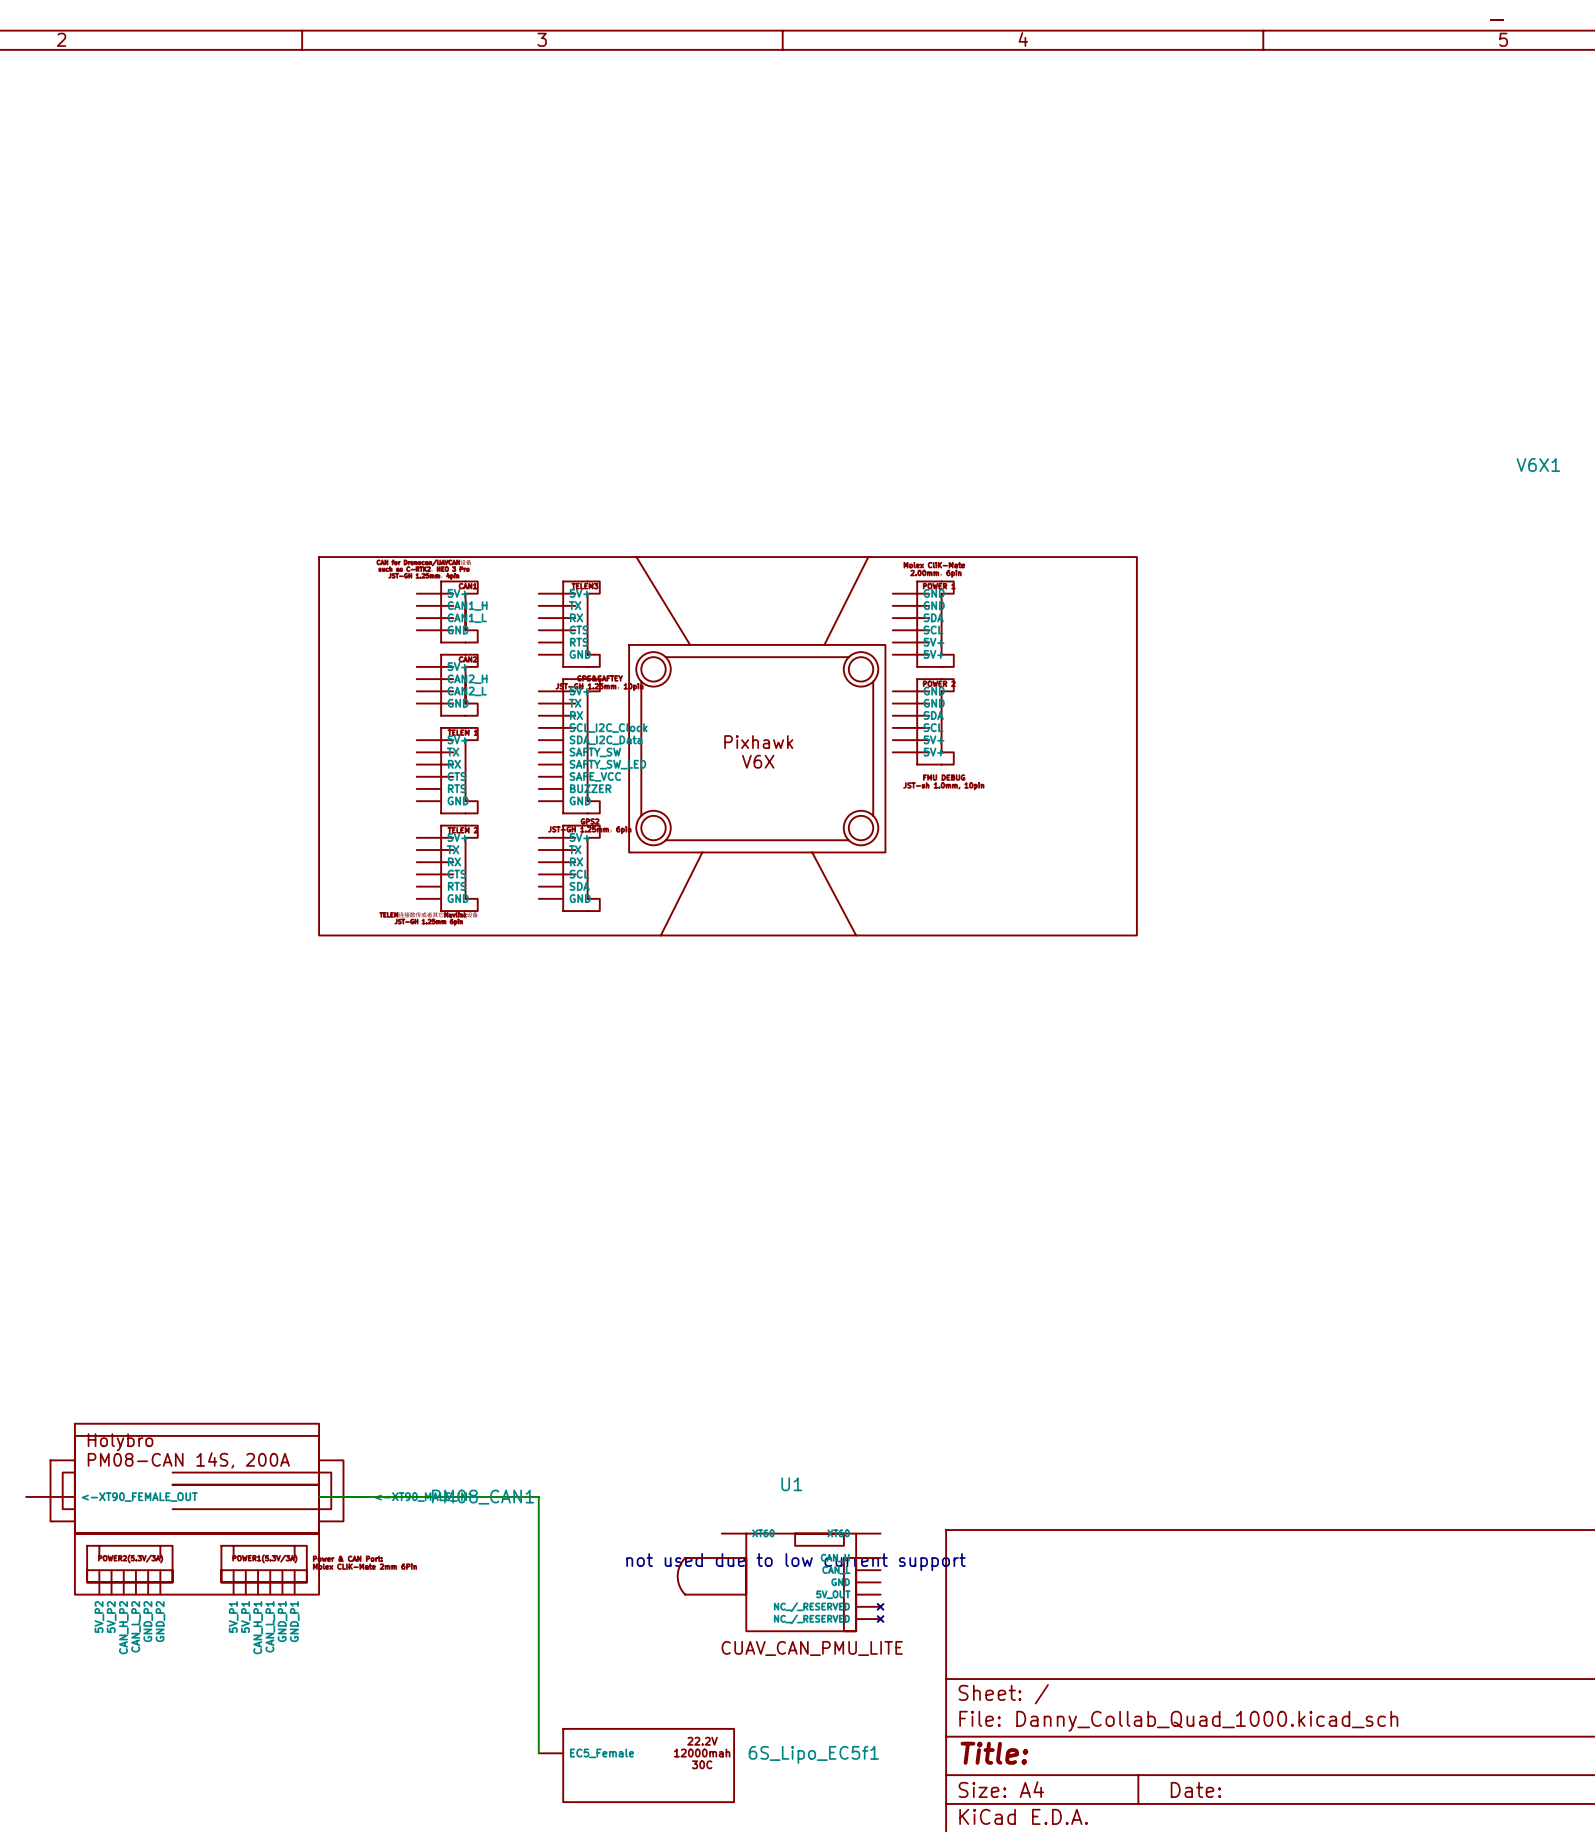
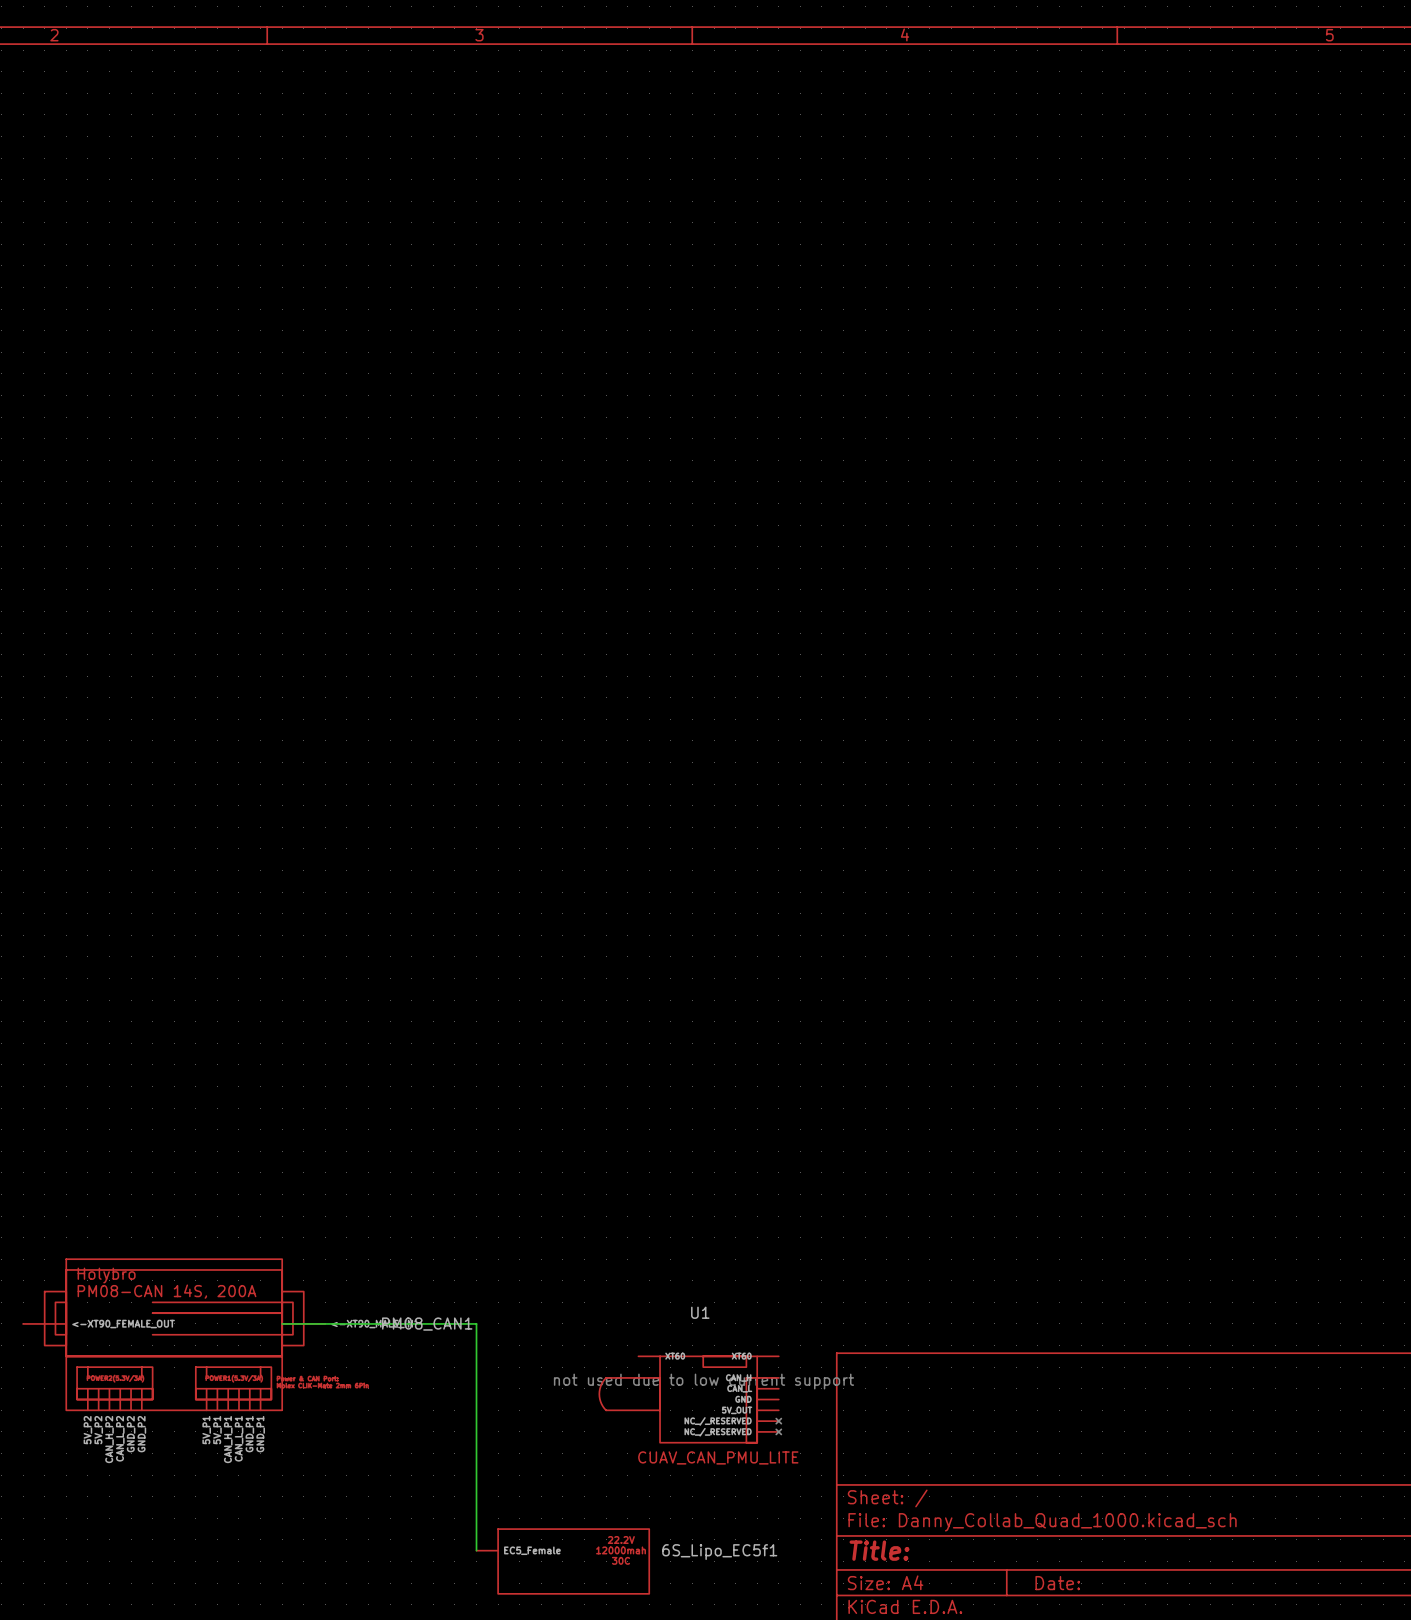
V6X1: (911, 477) -> none

